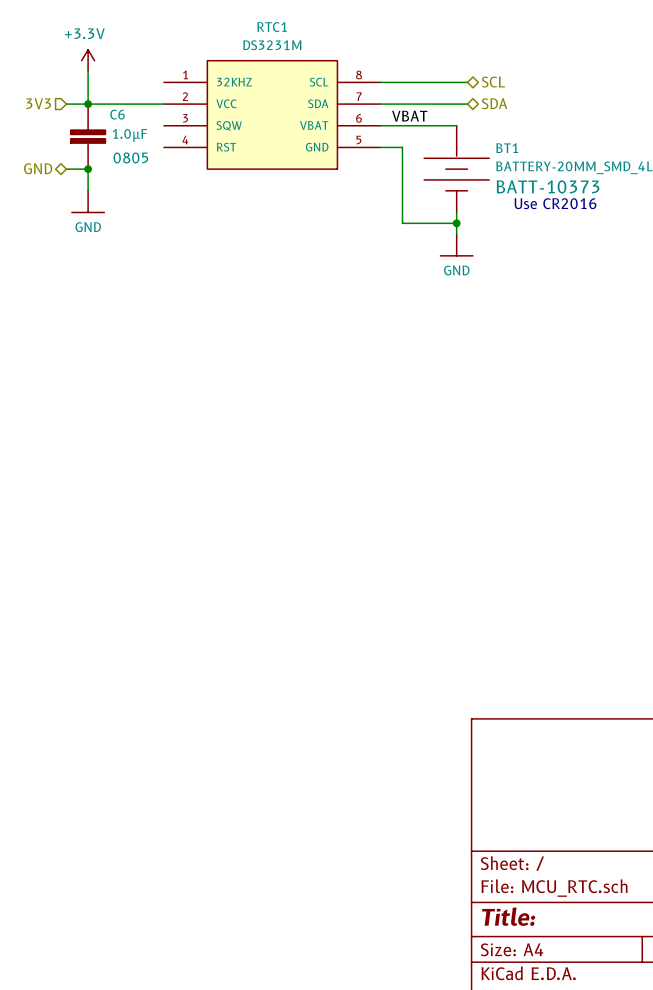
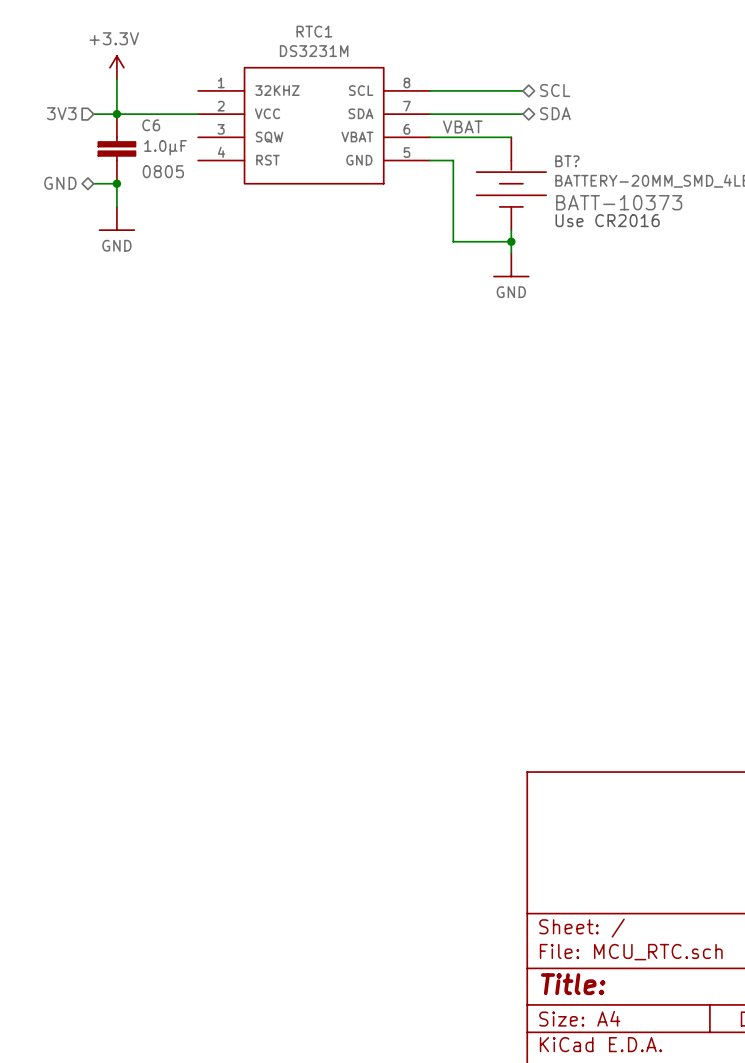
BT1 name: BT1 (507, 148) -> BT? (567, 161)

